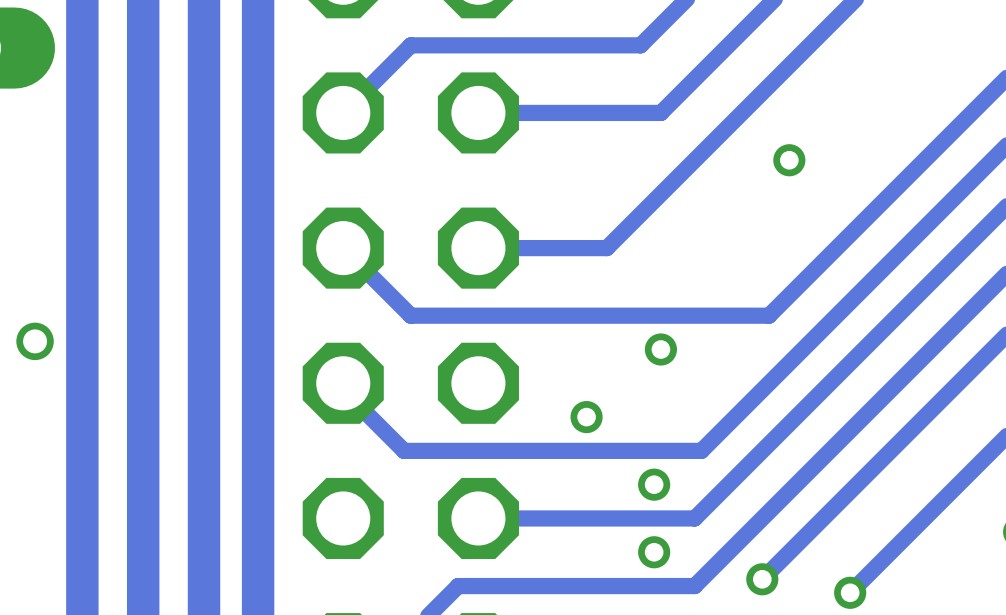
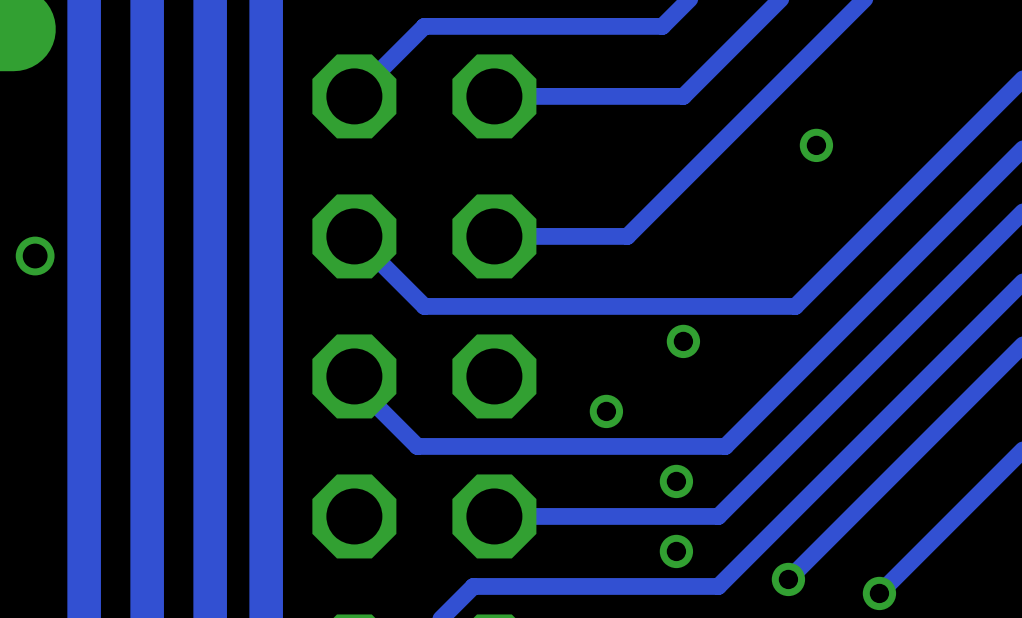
via position: (35, 341) -> (35, 256)

